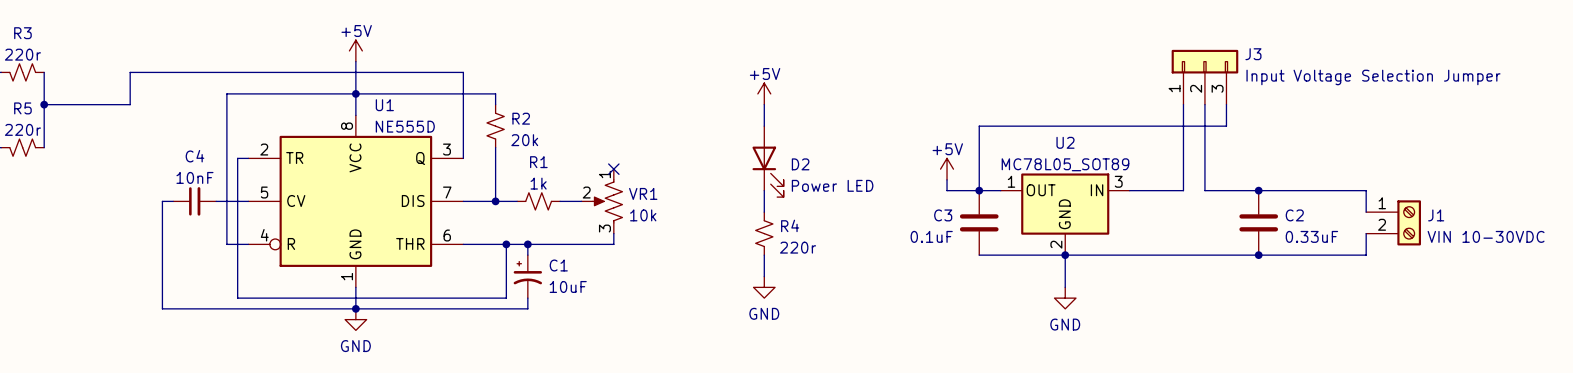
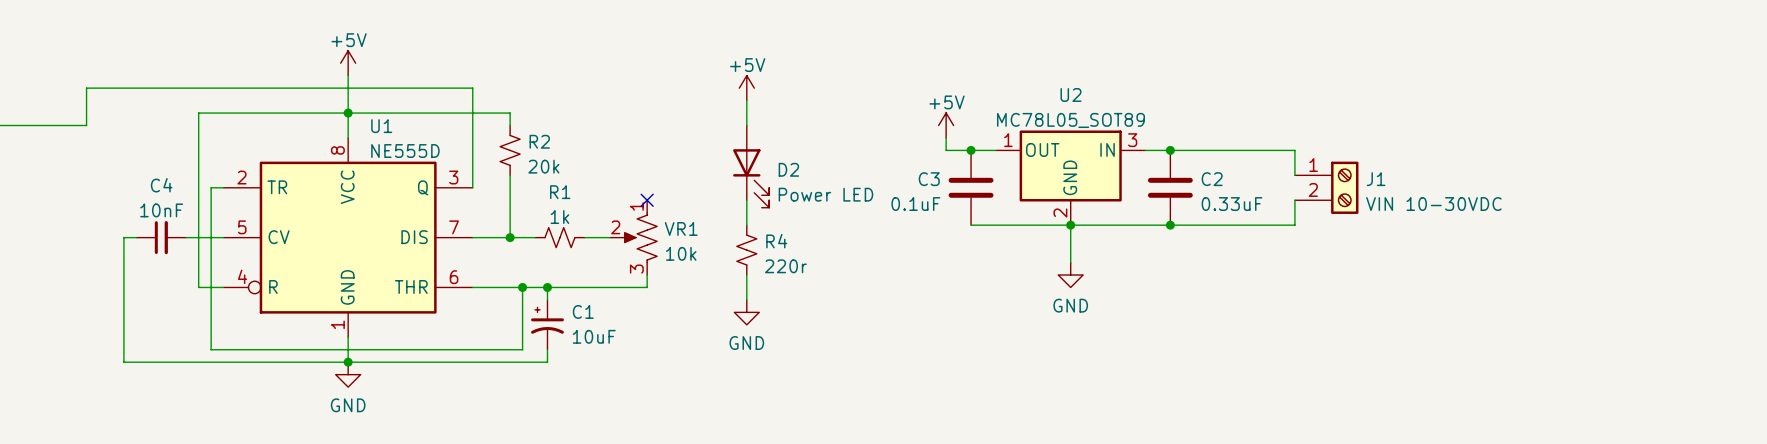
power symbol: none -> +5V (746, 88)
J3: Input Voltage Selection Jumper (1204, 77) -> none
power symbol: +5V (764, 93) -> none
wire: (764, 104) (764, 126) -> (746, 100) (746, 125)
power symbol: none -> +5V (946, 125)
wire: (1183, 104) (1183, 190) (1172, 190) -> (1294, 200) (1294, 225)
wire: (1204, 104) (1204, 190) (1366, 190) (1366, 212) -> none
wire: (1226, 104) (1226, 126) (1172, 126) -> (1294, 175) (1294, 150)
wire: none -> (946, 137) (946, 150) (995, 150)
junction: none -> (971, 150)
junction: none -> (1170, 150)
D2 position: (768, 161) -> (751, 166)
power symbol: +5V (947, 169) -> none
wire: (947, 179) (947, 190) -> (971, 225) (1033, 225)
wire: (764, 190) (764, 212) -> (746, 200) (746, 225)
junction: none -> (1170, 225)
junction: (1258, 190) -> none
U2 position: (1065, 214) -> (1070, 177)
C3 position: (979, 222) -> (971, 187)
C2 position: (1258, 222) -> (1170, 187)
J1 position: (1393, 222) -> (1326, 187)
R4 position: (764, 233) -> (746, 250)
wire: (1366, 233) (1366, 255) (979, 255) -> none
wire: (764, 255) (764, 276) -> (746, 275) (746, 299)
wire: (1065, 255) (1065, 287) -> none
junction: (1065, 255) -> none
junction: (1258, 255) -> none
power symbol position: GND (764, 287) -> GND (746, 312)
power symbol position: GND (1065, 298) -> GND (1070, 275)

